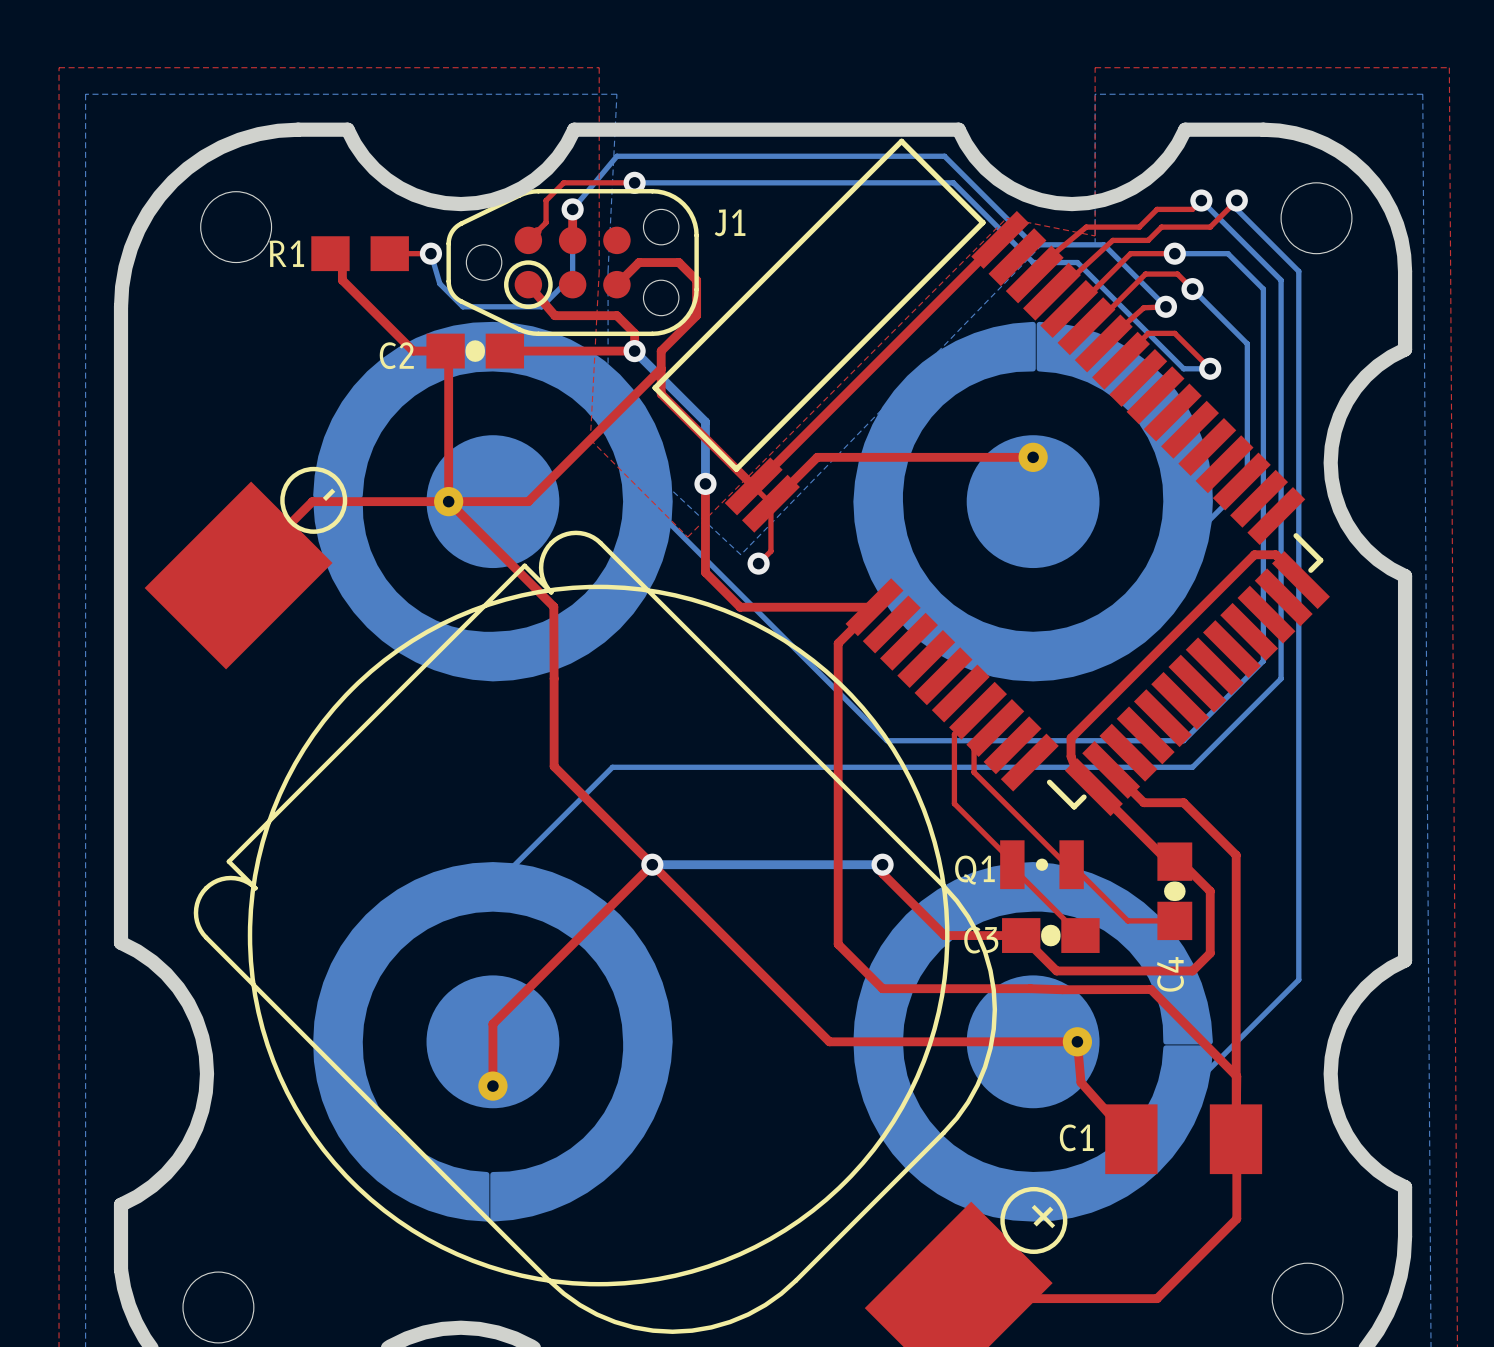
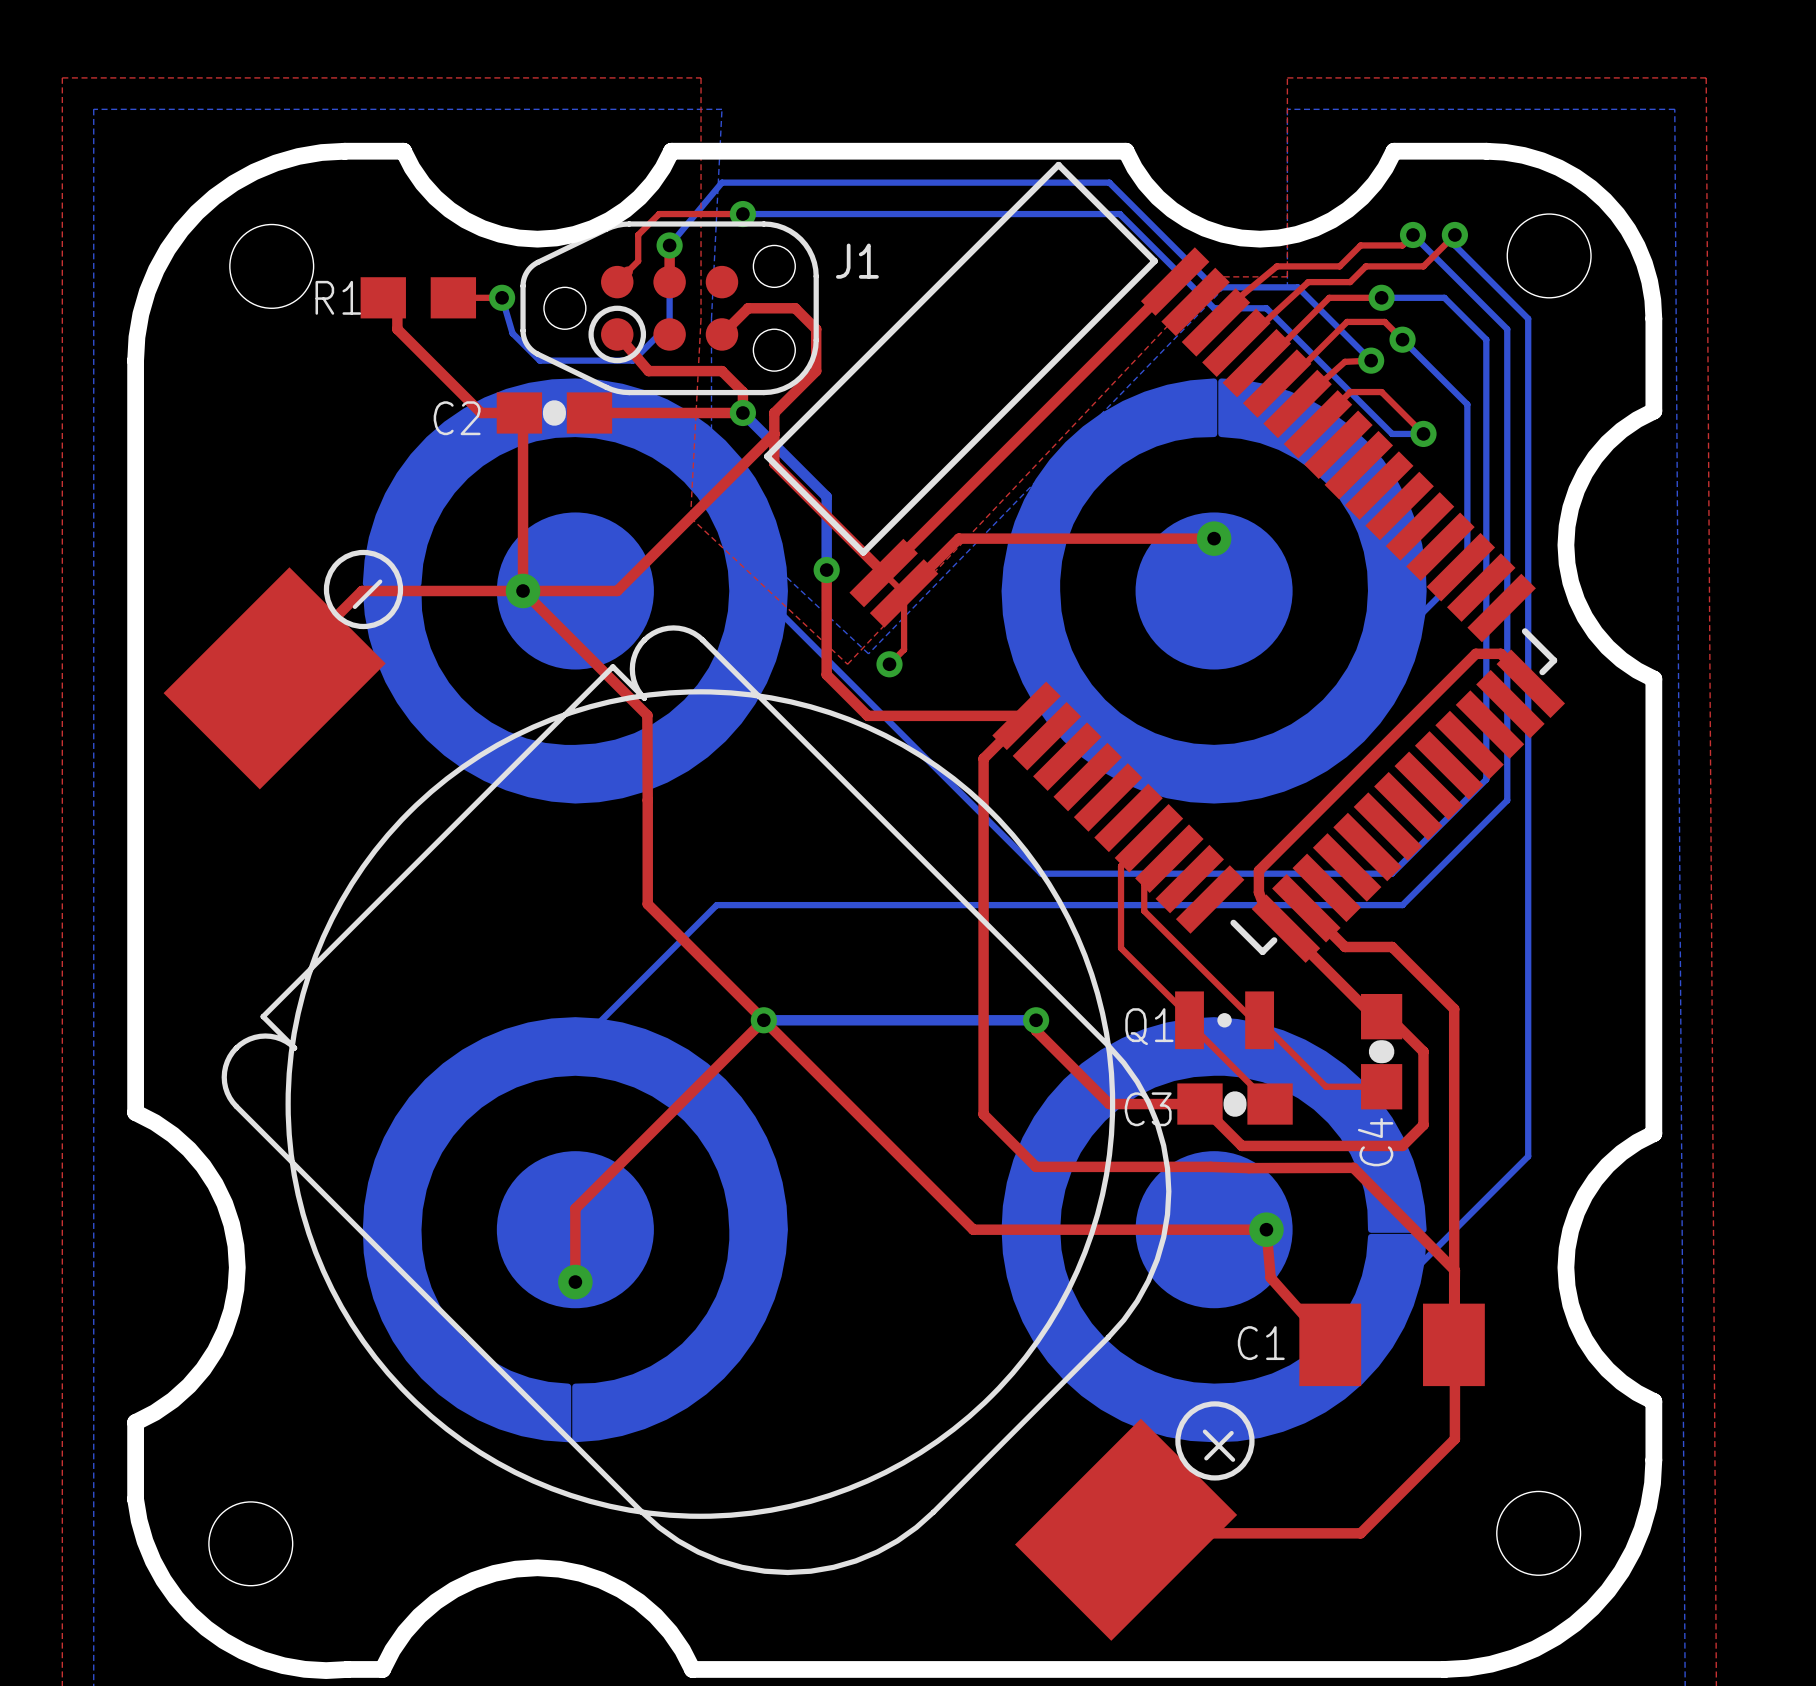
top zone outline: (1095, 235) (1006, 218) (687, 537) (590, 439) -> (1287, 276) (1214, 276) (847, 664) (690, 517)

